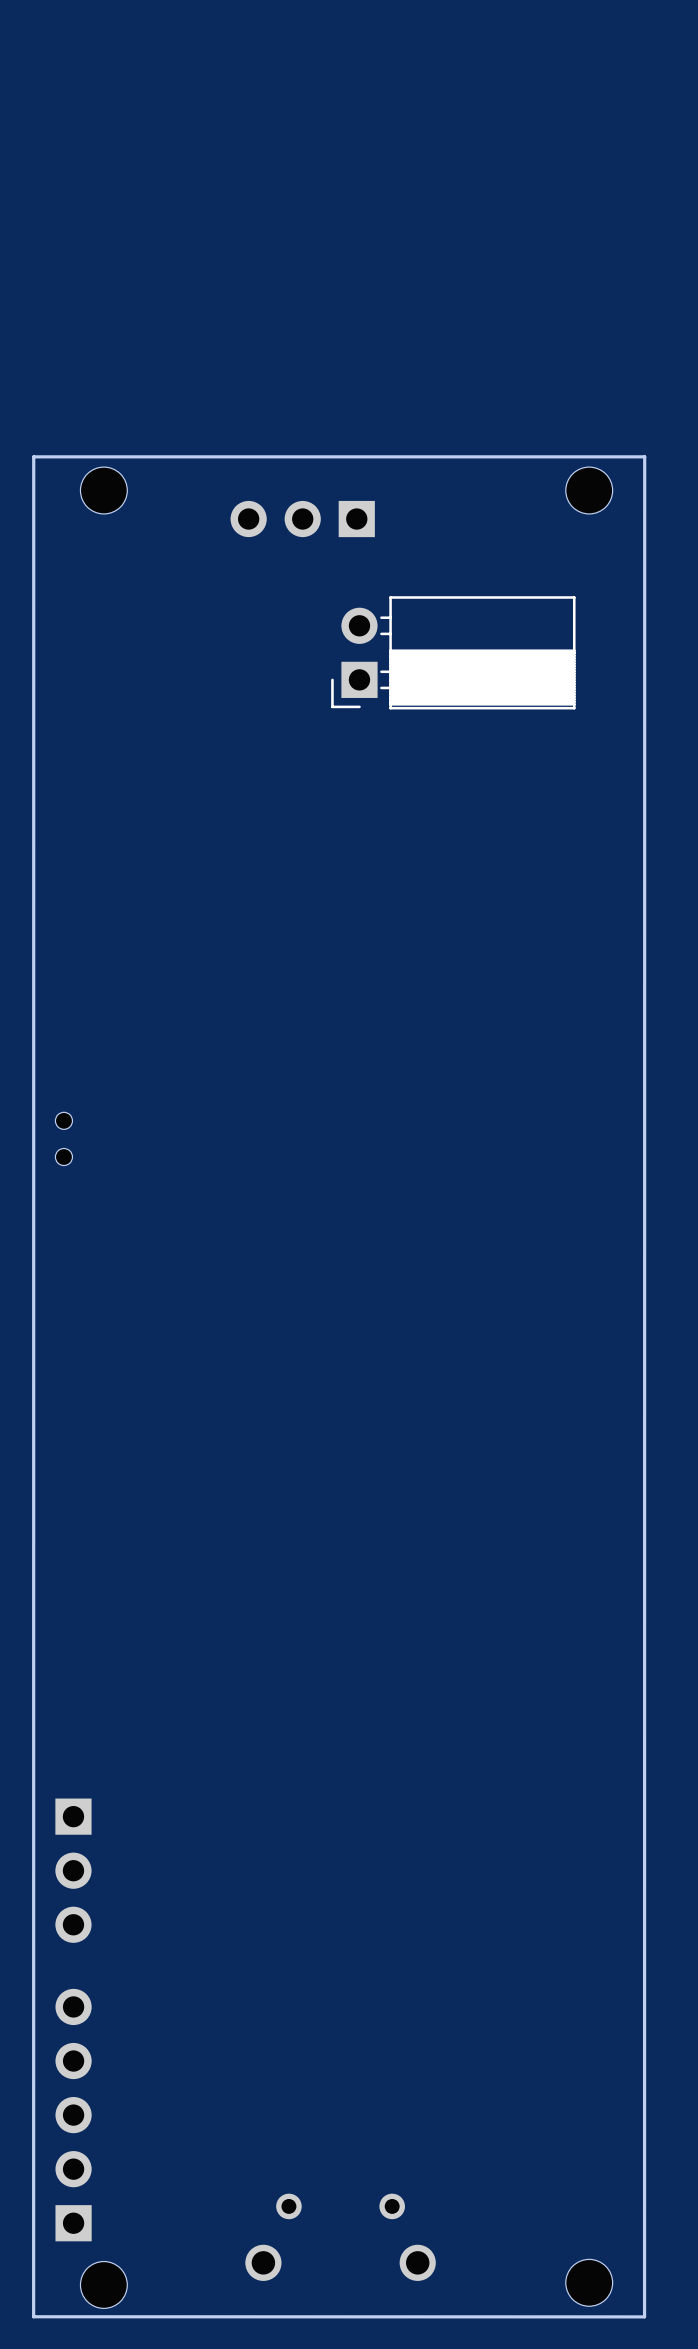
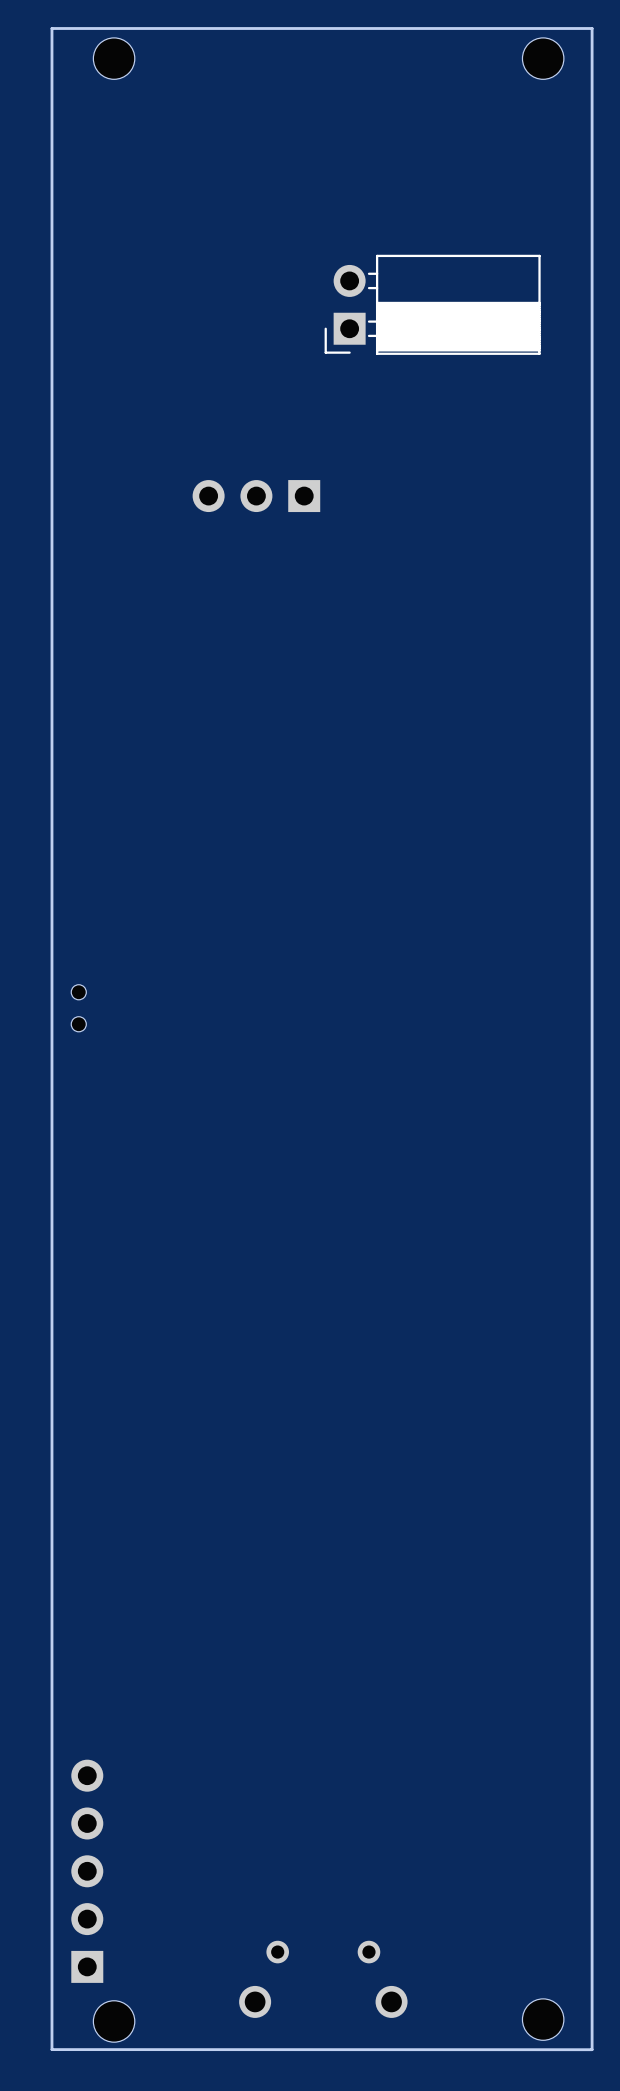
part: none -> (114, 58)
part: none -> (543, 58)
part: (103, 490) -> none
part: (589, 490) -> none
part position: (302, 519) -> (256, 496)
part position: (453, 652) -> (432, 304)
part: (73, 1870) -> none
board edge: (644, 2316) (644, 456) (33, 456) (33, 2316) -> (592, 2049) (592, 28) (51, 28) (51, 2049)

